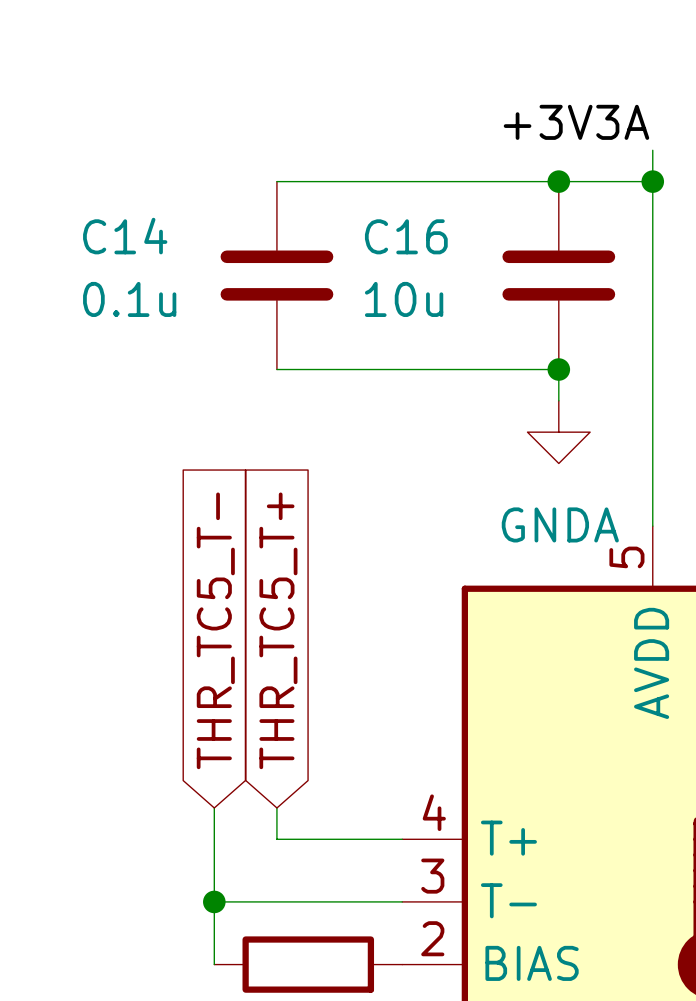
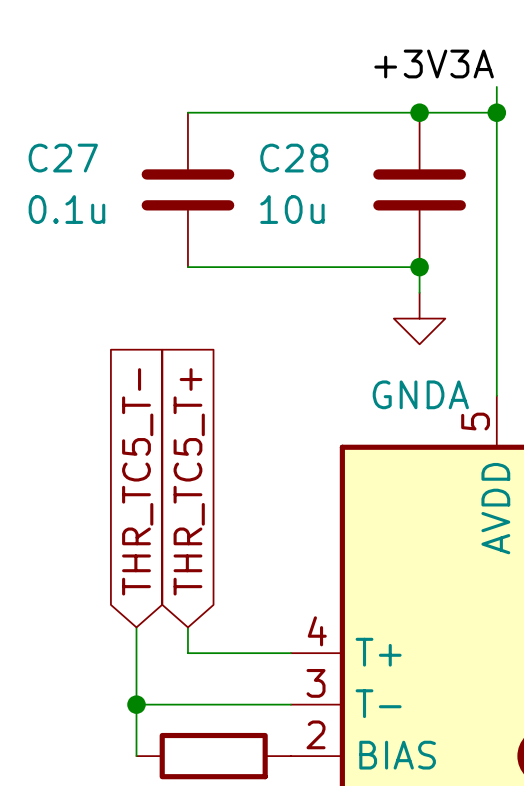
C14 name: C14 (125, 236) -> C27 (63, 158)
C16 name: C16 (406, 236) -> C28 (294, 158)

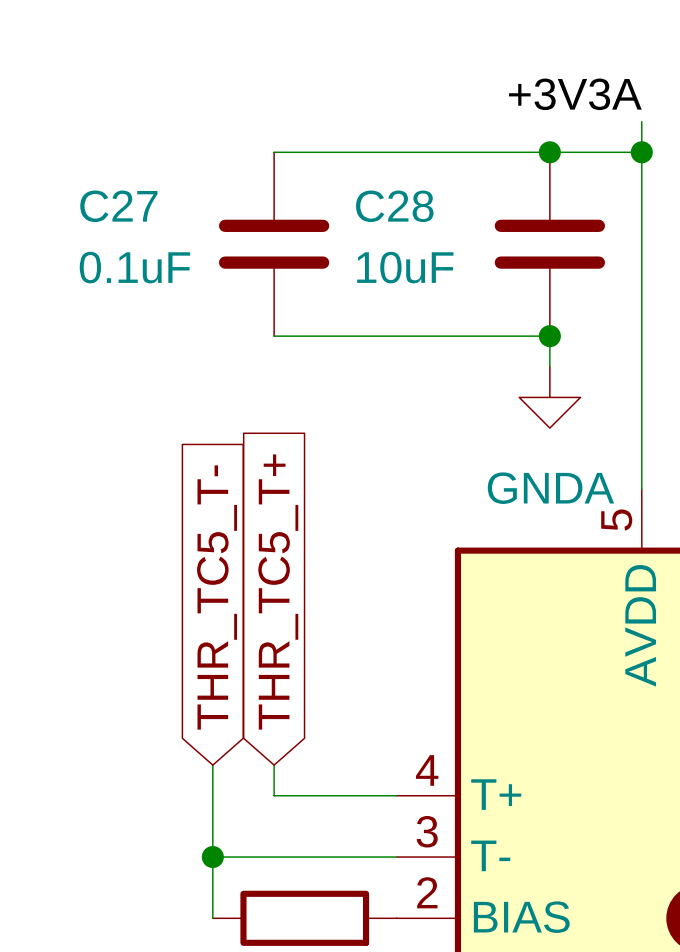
C27 value: 0.1u (66, 209) -> 0.1uF (134, 267)
C28 value: 10u (292, 209) -> 10uF (405, 267)

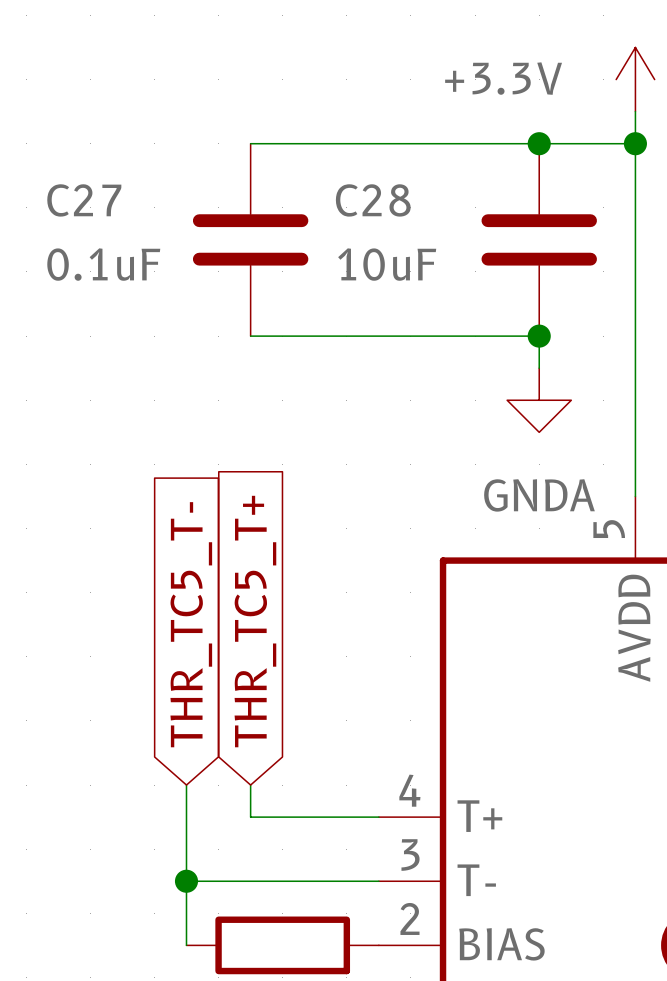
power symbol: none -> +3.3V (635, 79)
label: +3V3A (575, 94) -> none

